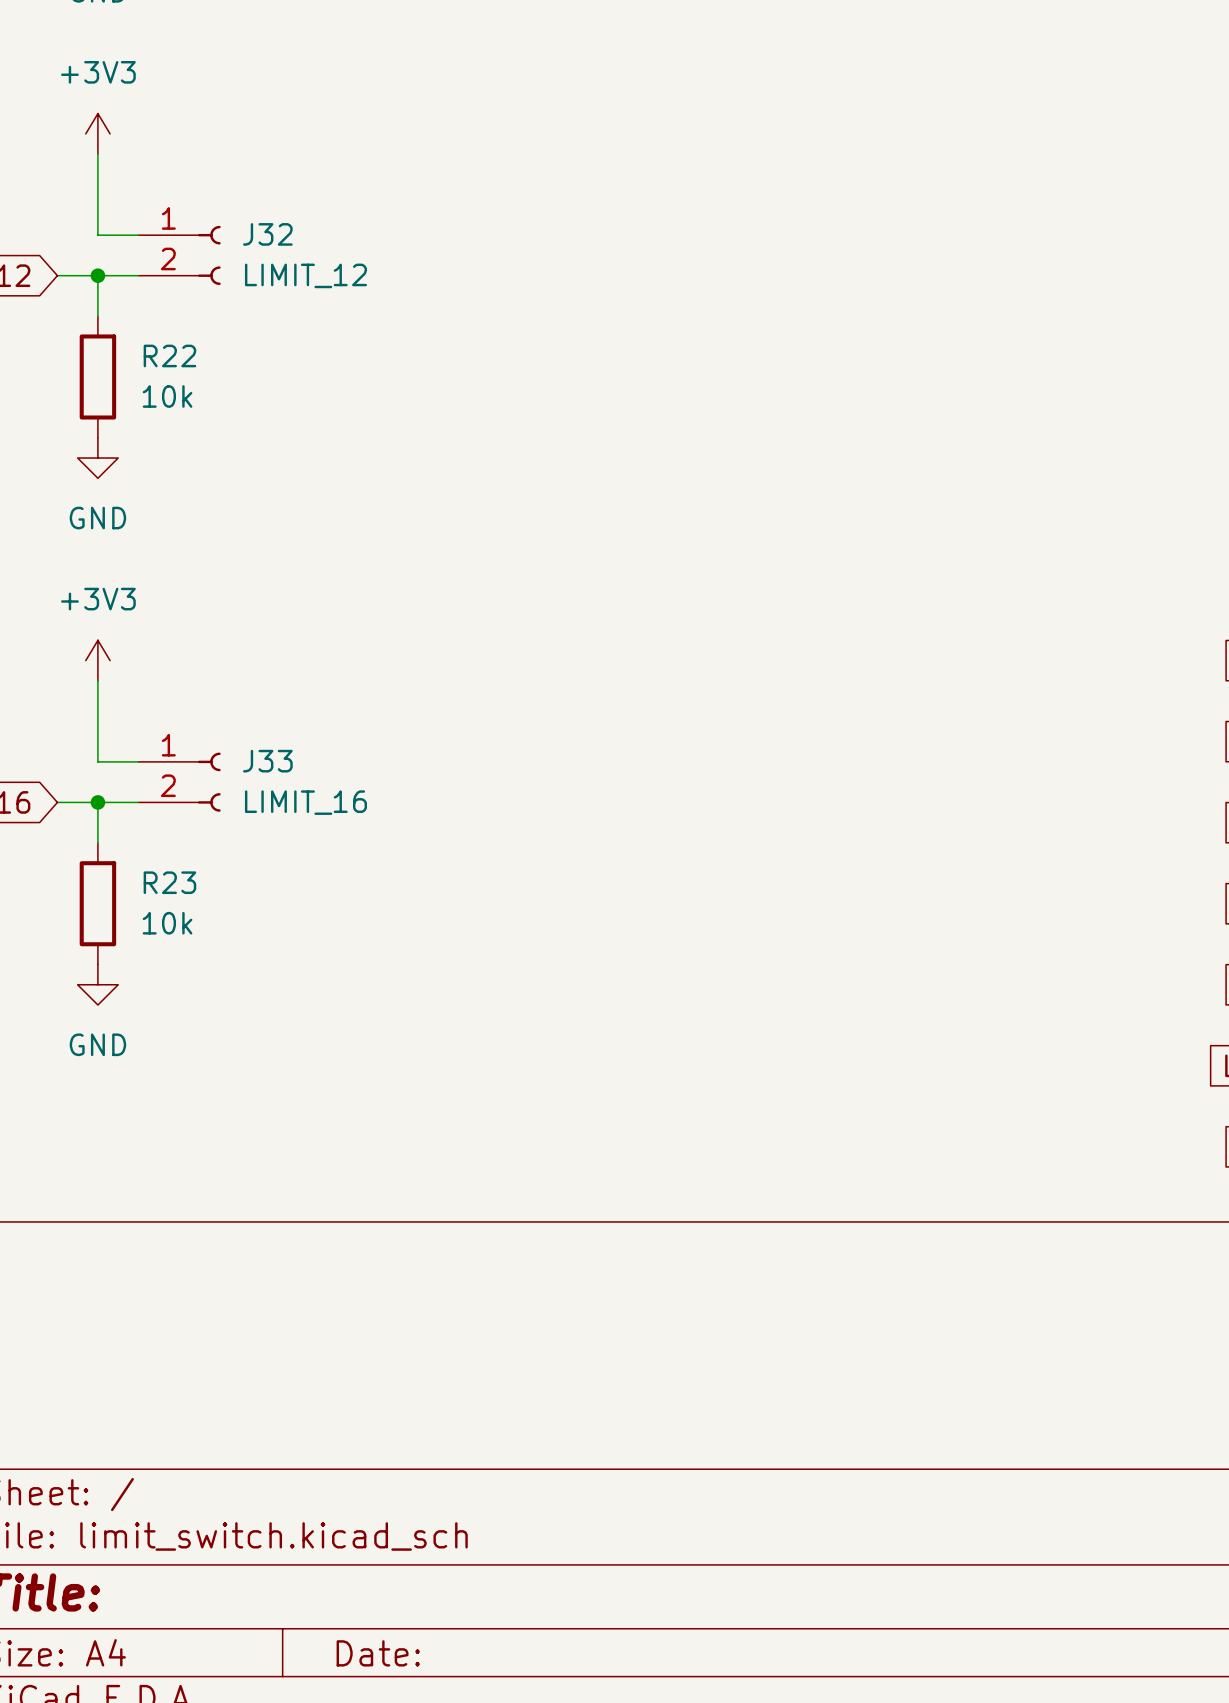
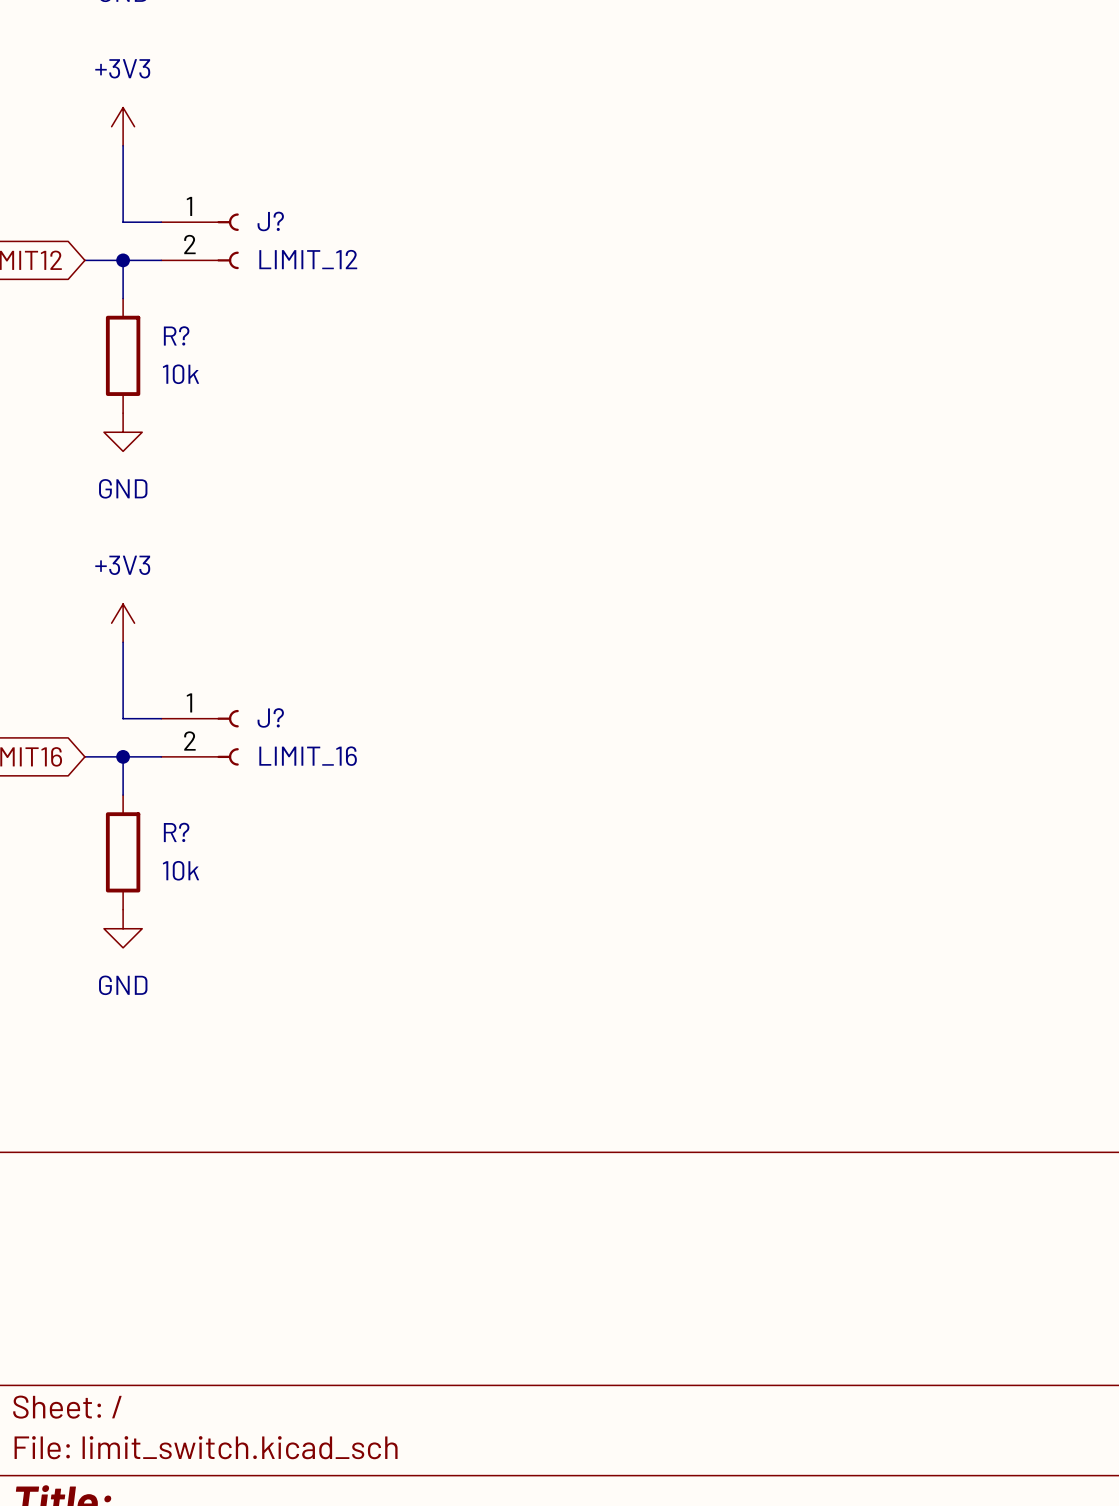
J32 name: J32 (267, 234) -> J? (270, 221)
R22 name: R22 (169, 355) -> R? (176, 335)
J33 name: J33 (267, 761) -> J? (270, 717)
R23 name: R23 (169, 882) -> R? (176, 832)

